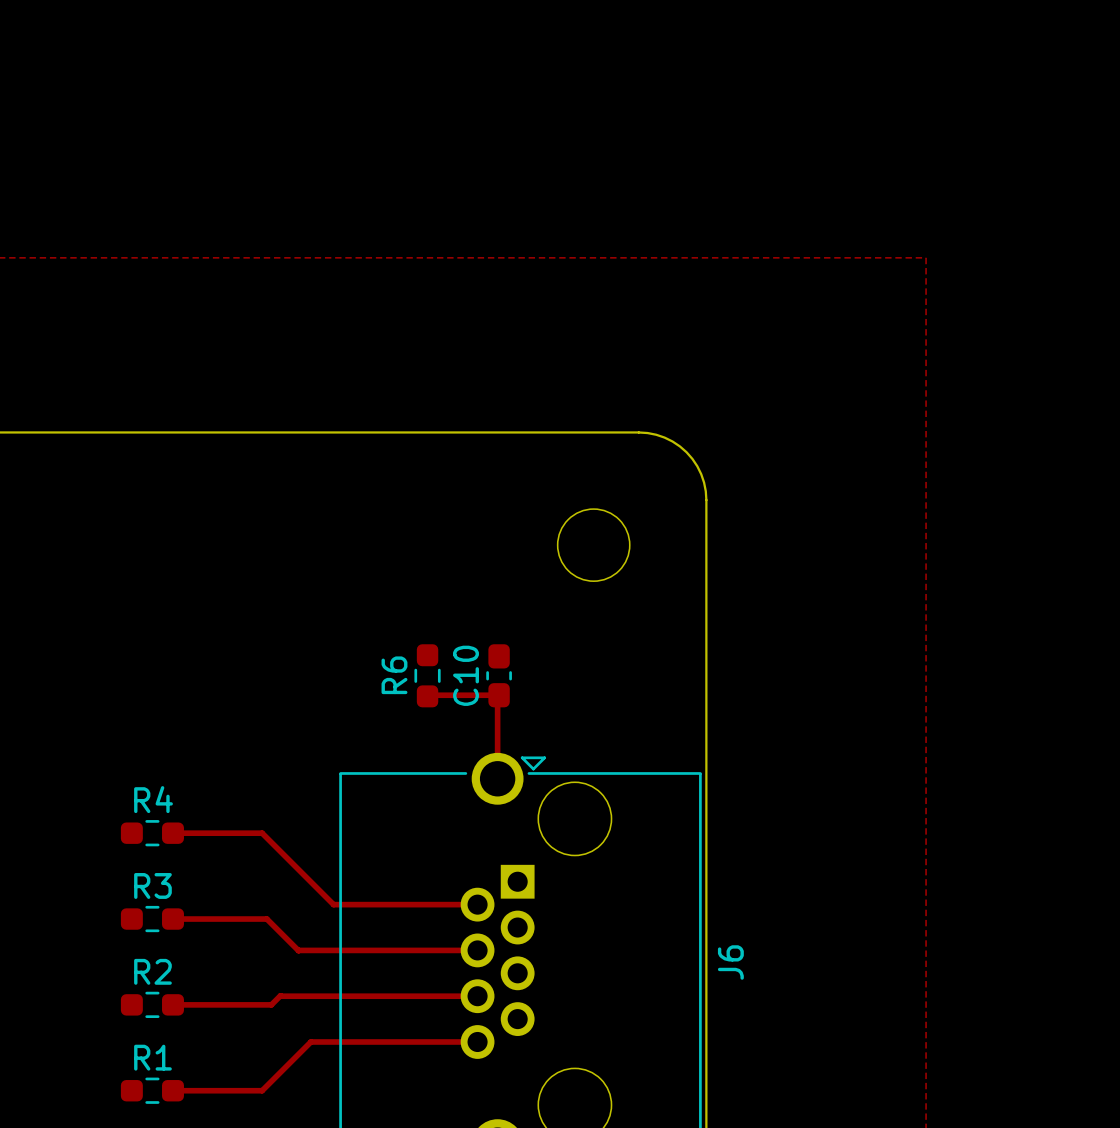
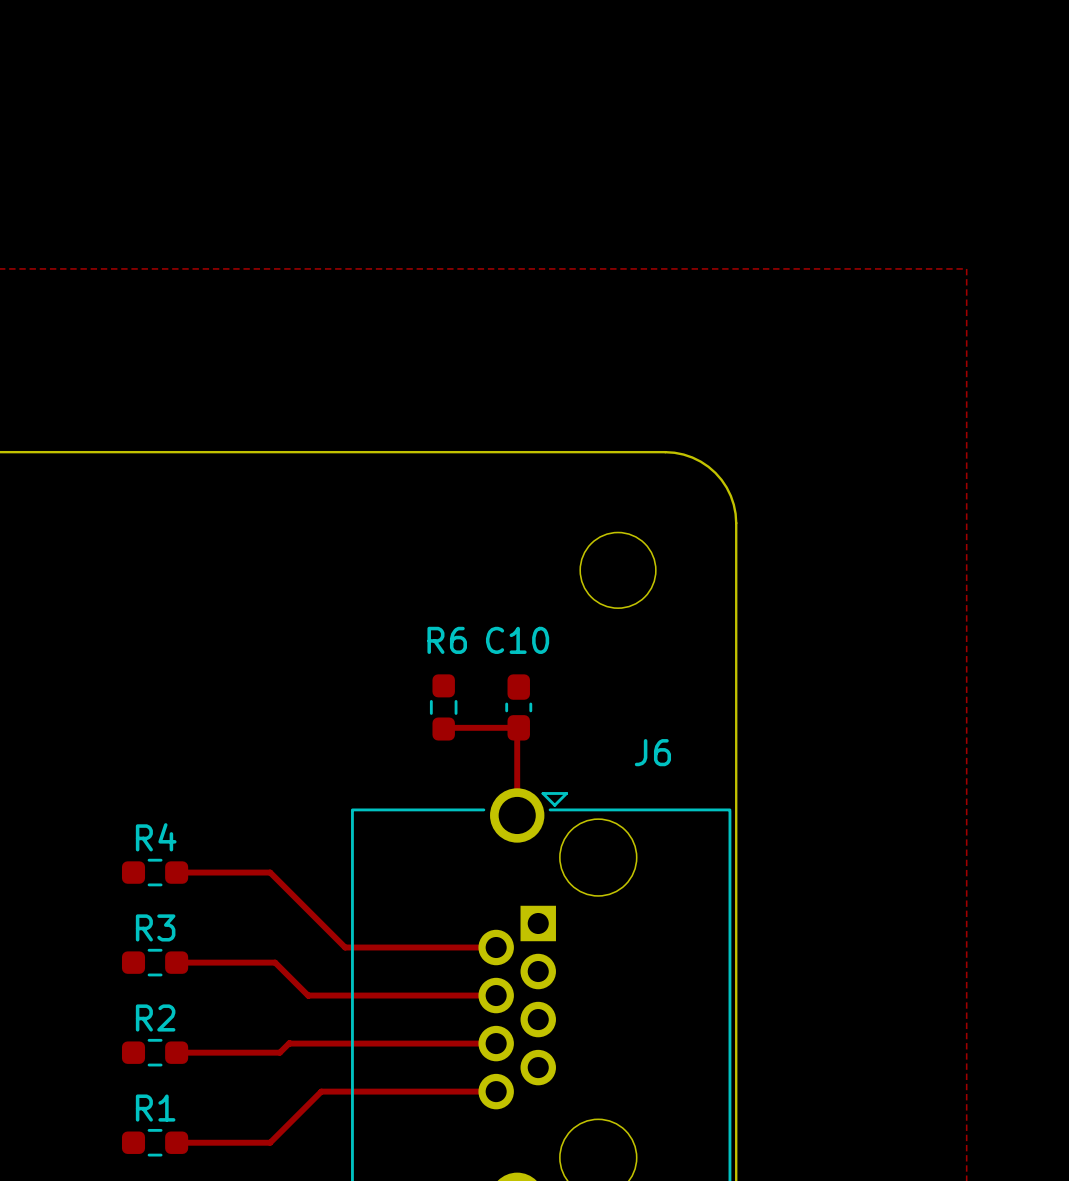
R6 name rotation: 0° (394, 675) -> 90° clockwise (447, 640)
R6 name position: R6 (394, 675) -> R6 (447, 640)
C10 name rotation: 0° (466, 675) -> 90° clockwise (517, 640)
J6 name rotation: 0° (730, 962) -> 90° clockwise (652, 752)
J6 name position: J6 (730, 962) -> J6 (652, 752)

